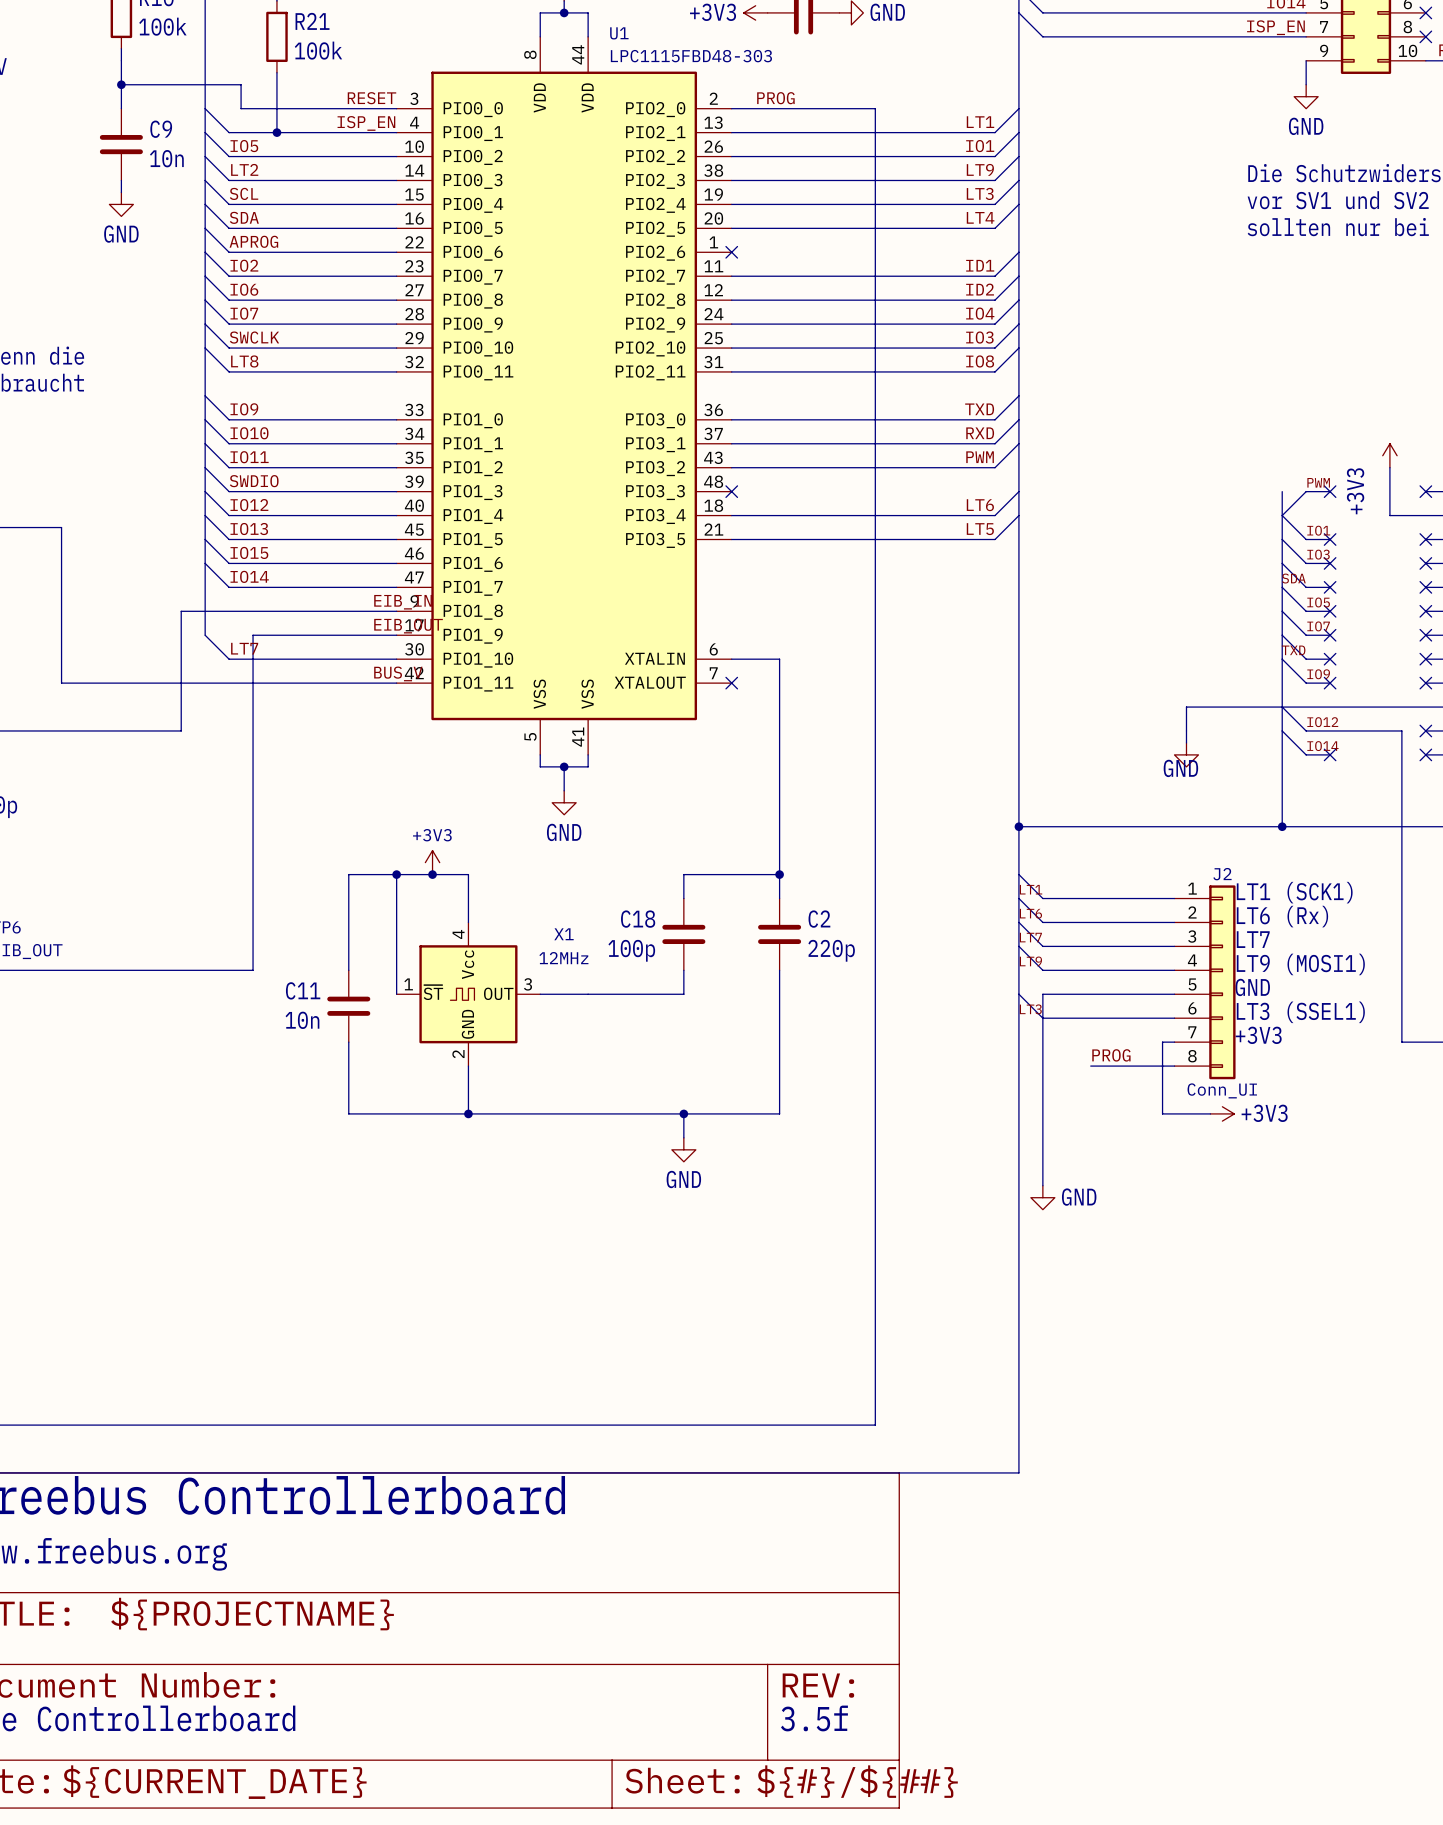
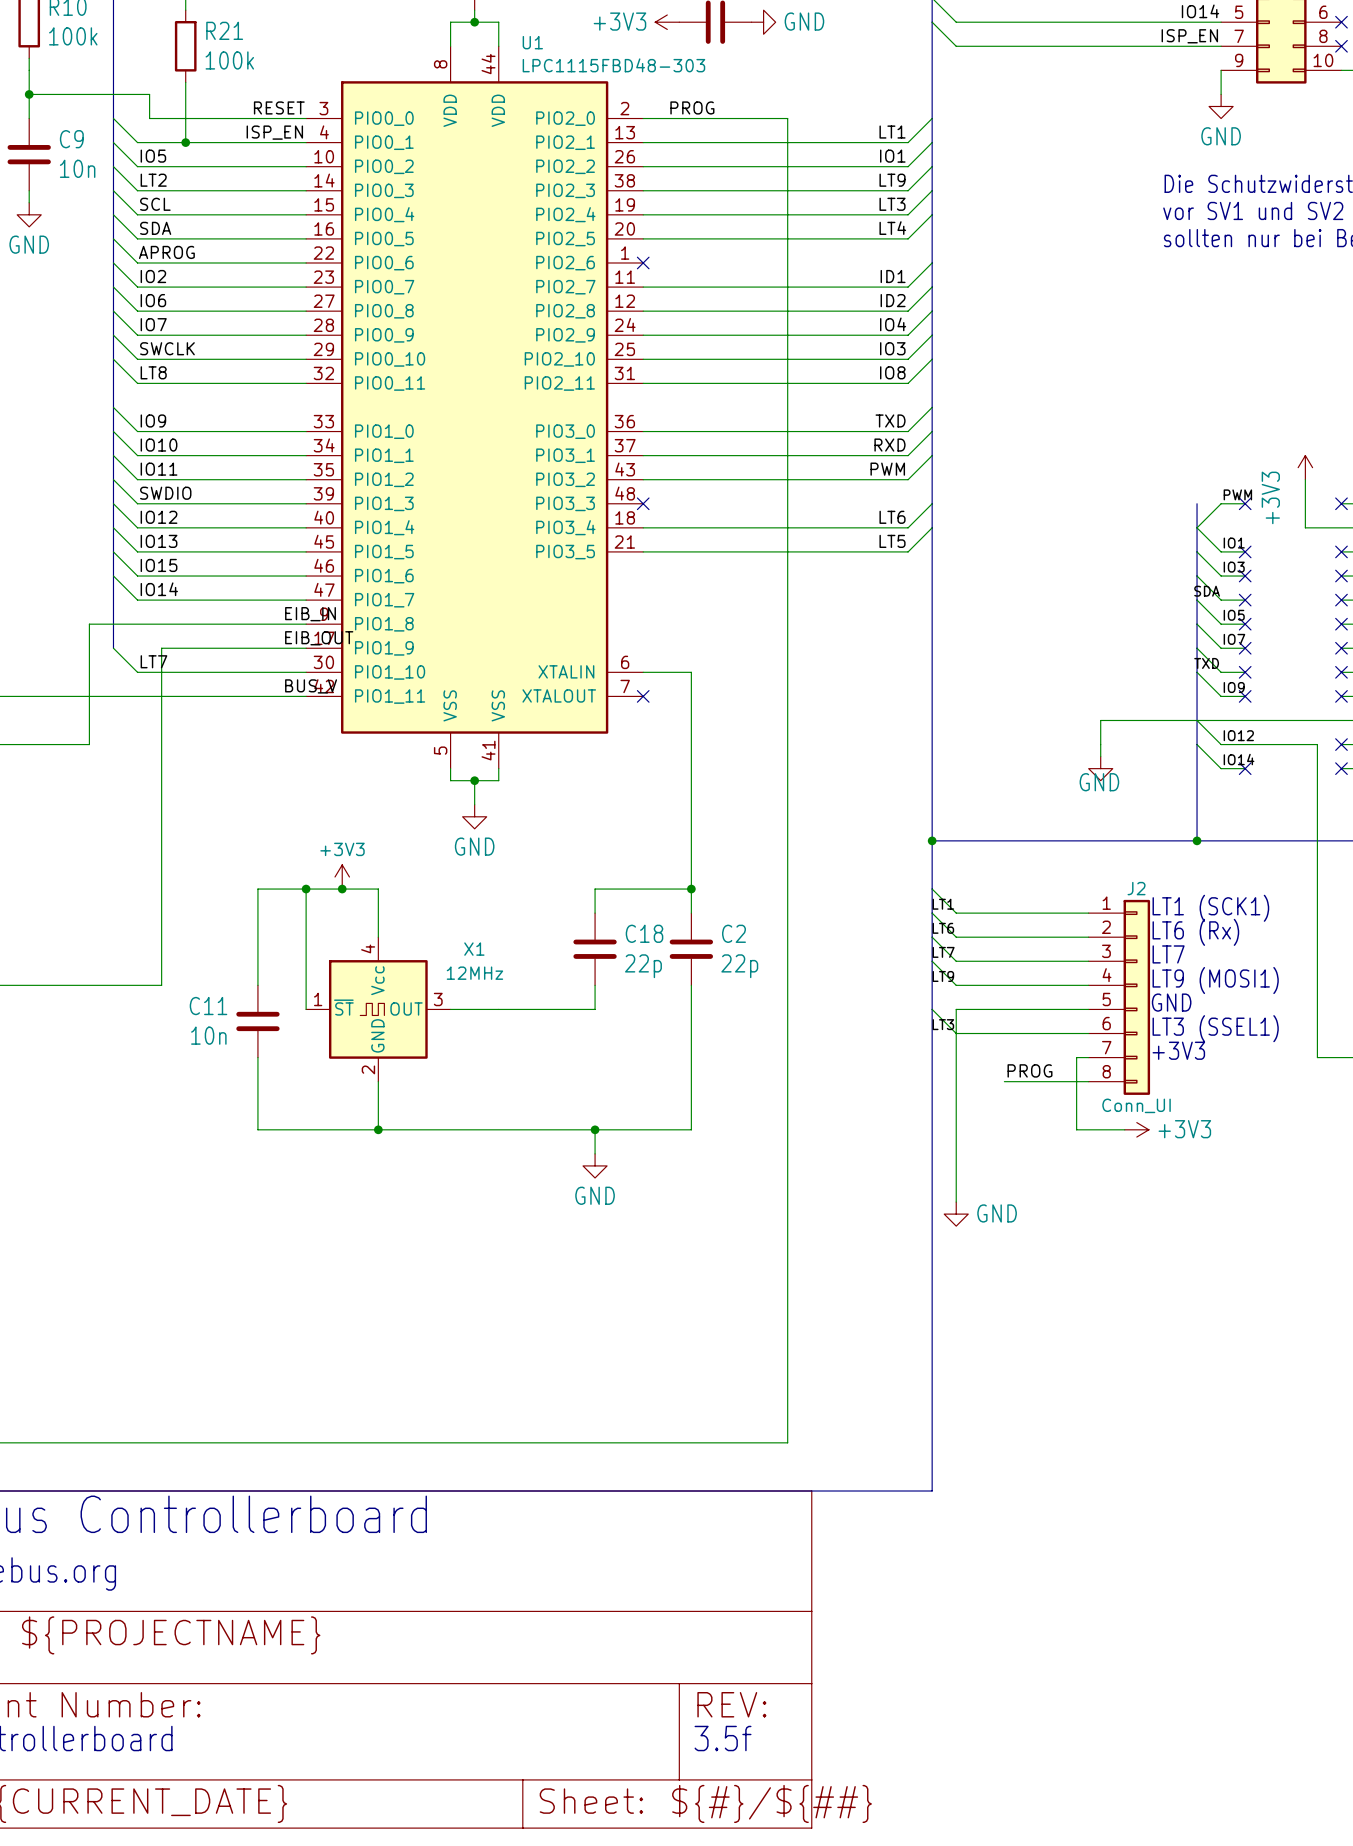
C18 name position: C18 (638, 919) -> C18 (644, 933)
C18 value: 100p (631, 950) -> 22p (643, 966)
C2 value: 220p (831, 950) -> 22p (739, 966)

